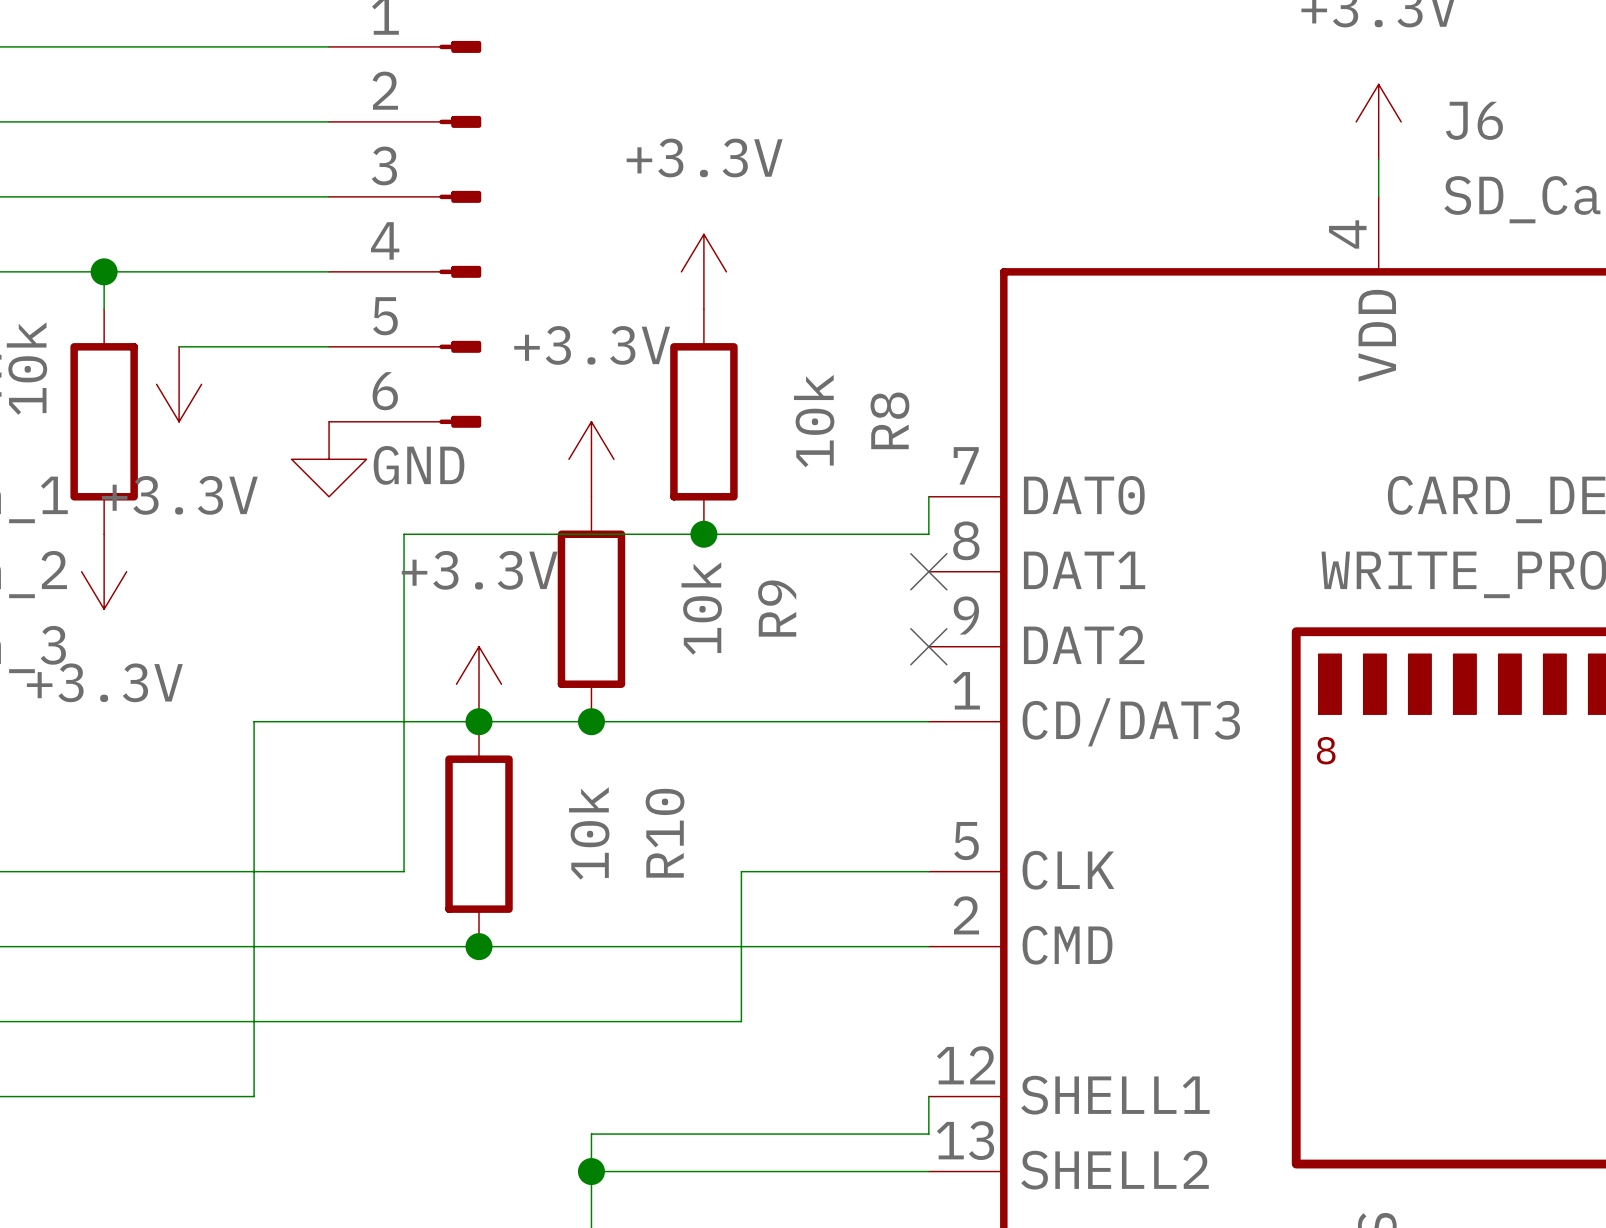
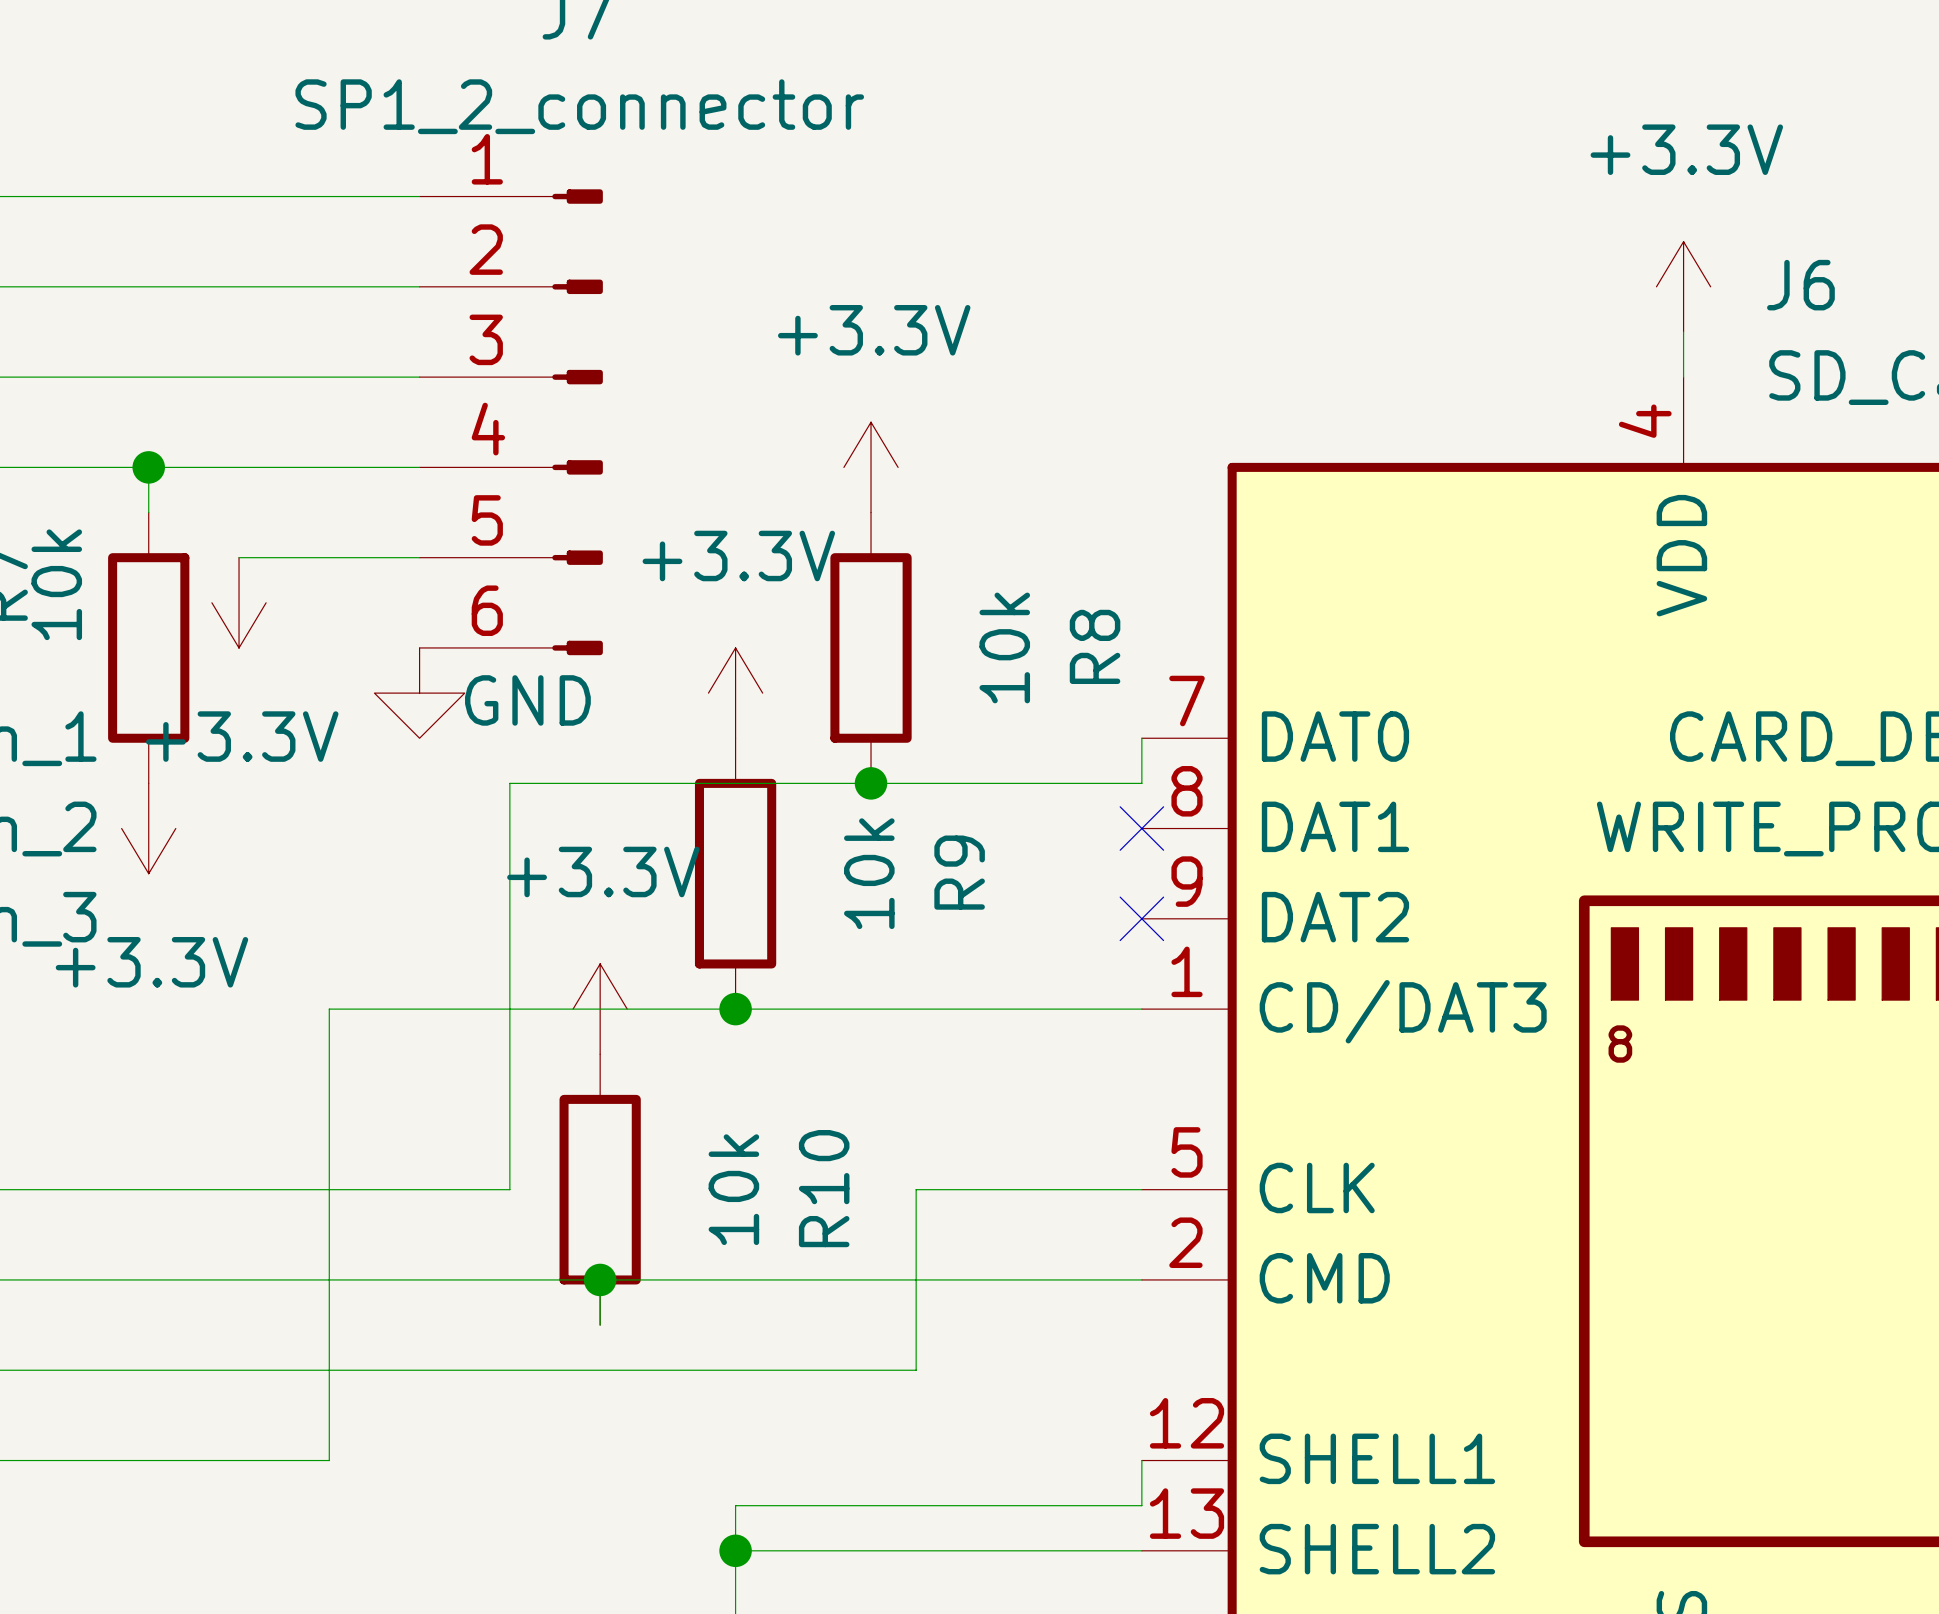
power symbol position: +3.3V (479, 684) -> +3.3V (600, 1009)
junction: (479, 721) -> none
R10 position: (479, 834) -> (600, 1189)
wire: none -> (600, 1279) (600, 1325)

